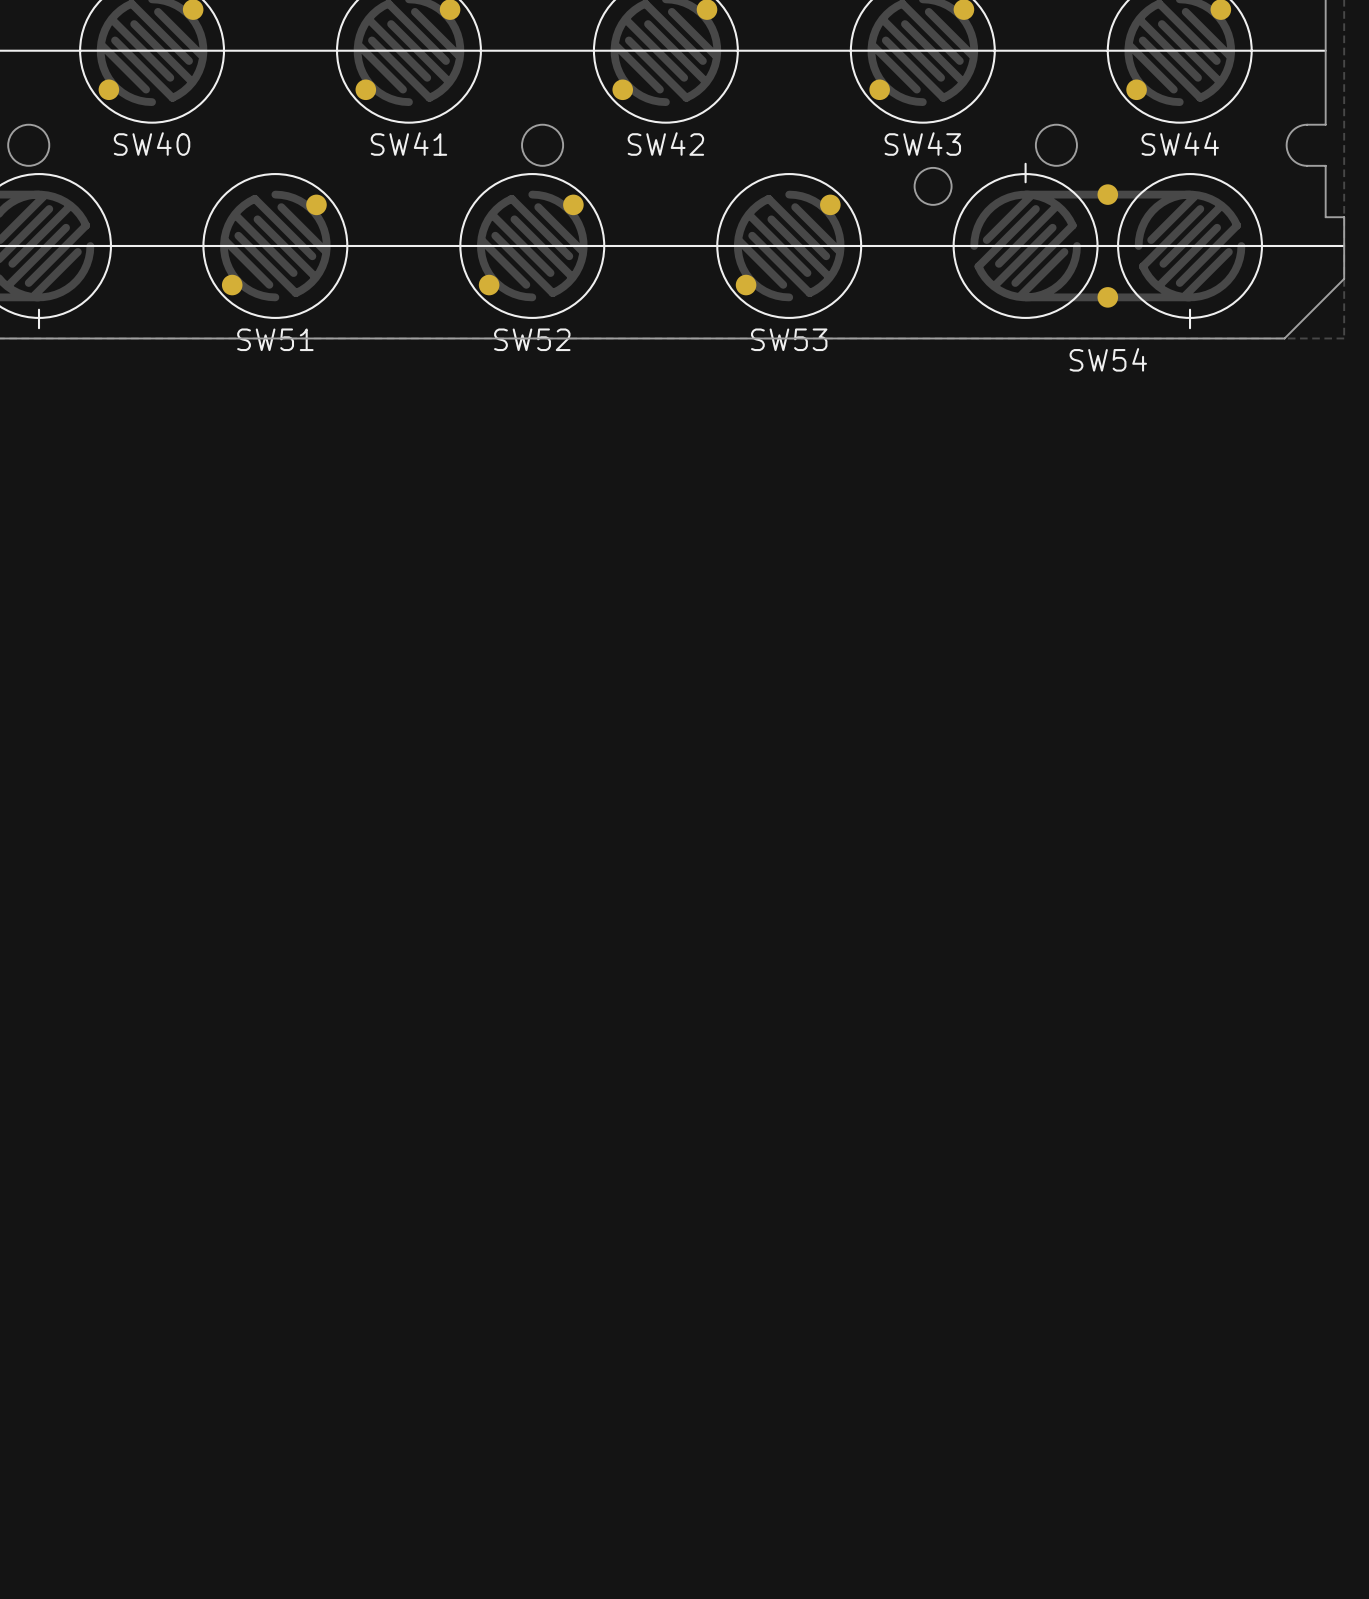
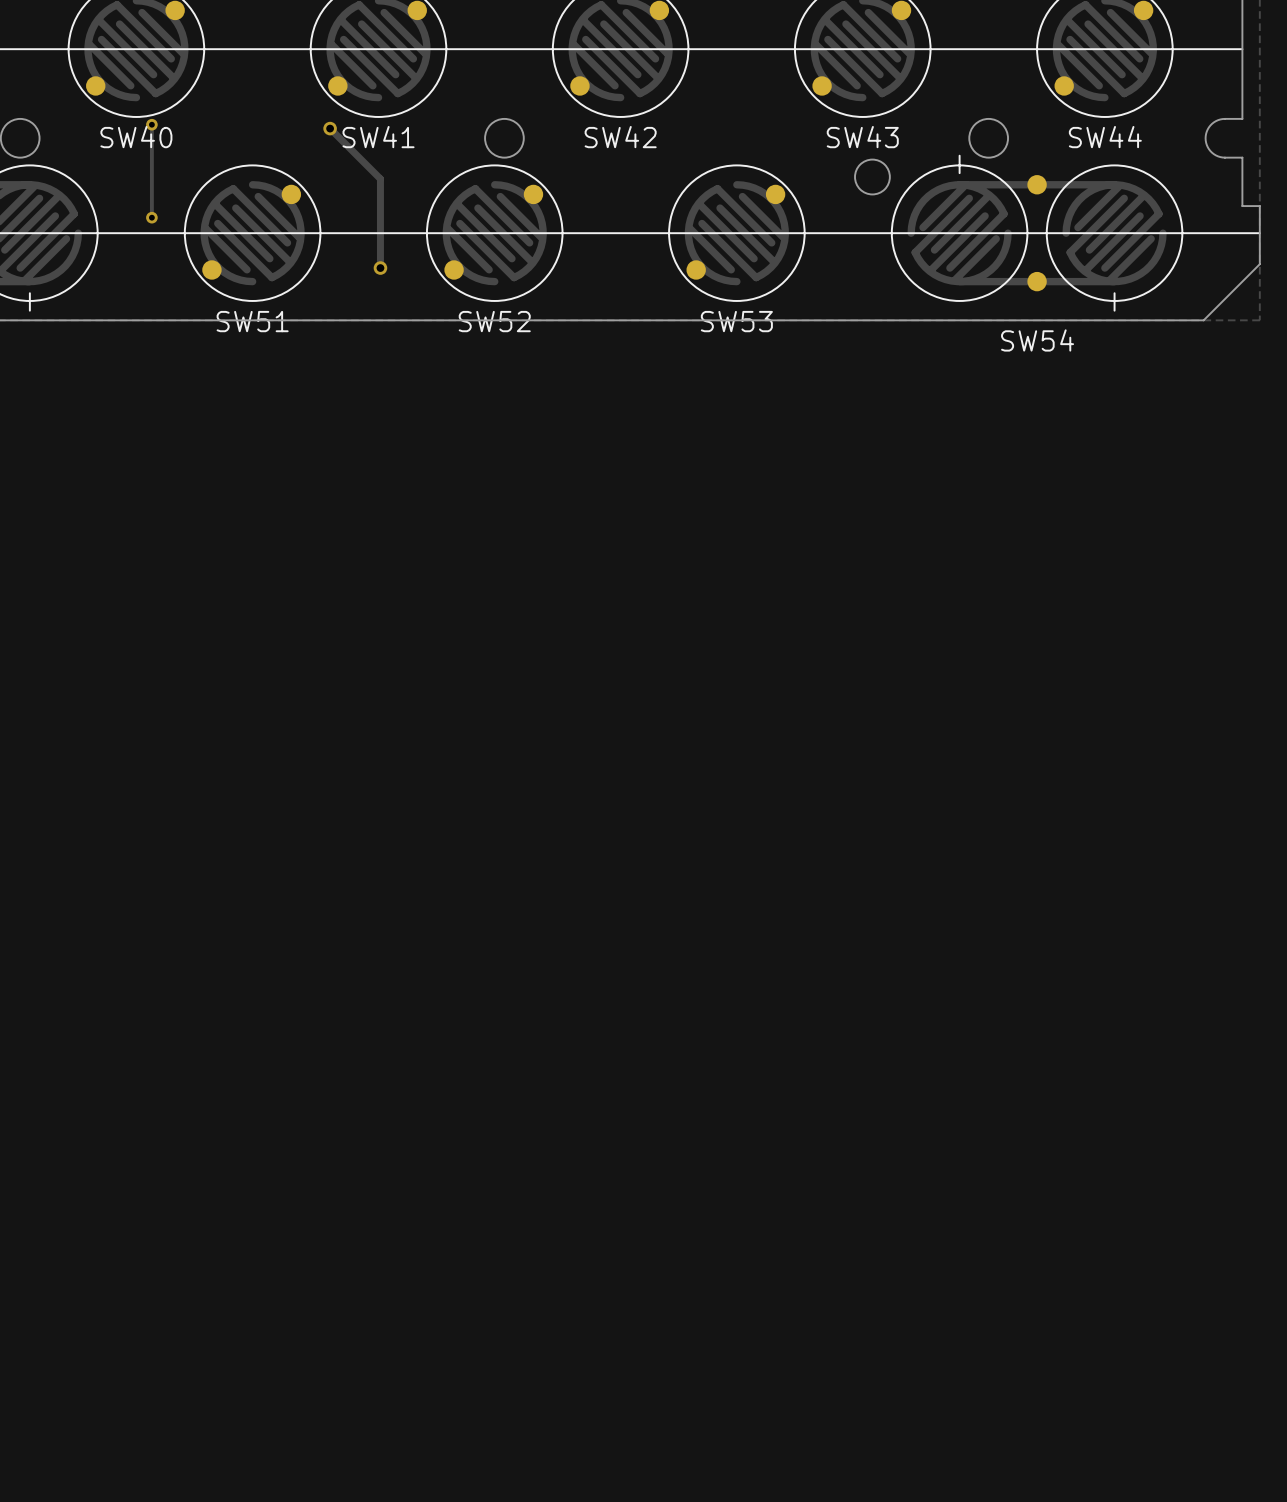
track: none -> (151, 124) (151, 217)
via: none -> (151, 124)
track: none -> (330, 128) (380, 178) (380, 268)
via: none -> (330, 128)
via: none -> (151, 217)
via: none -> (380, 268)

